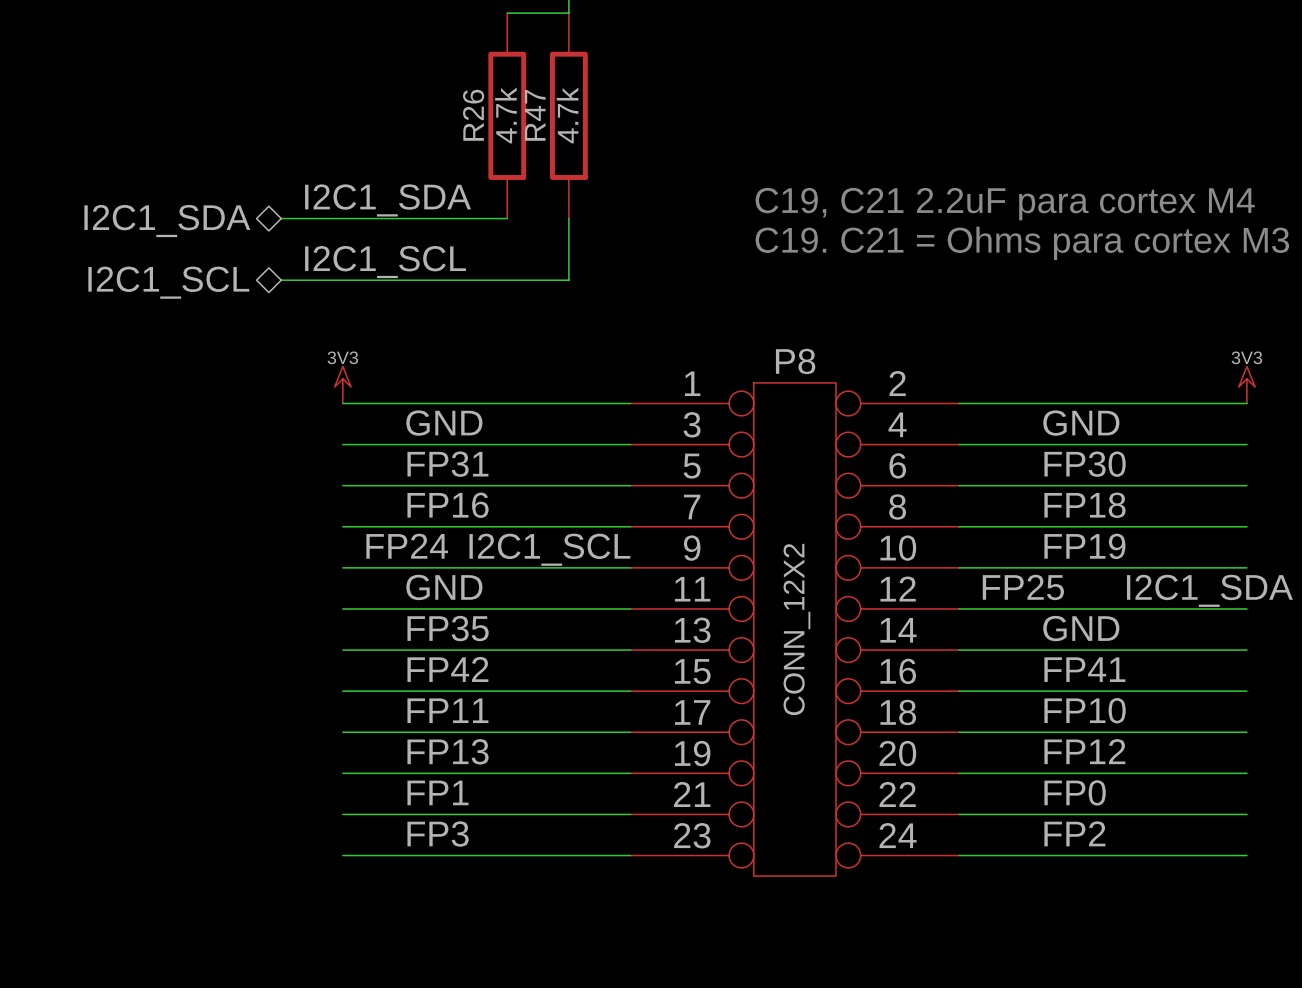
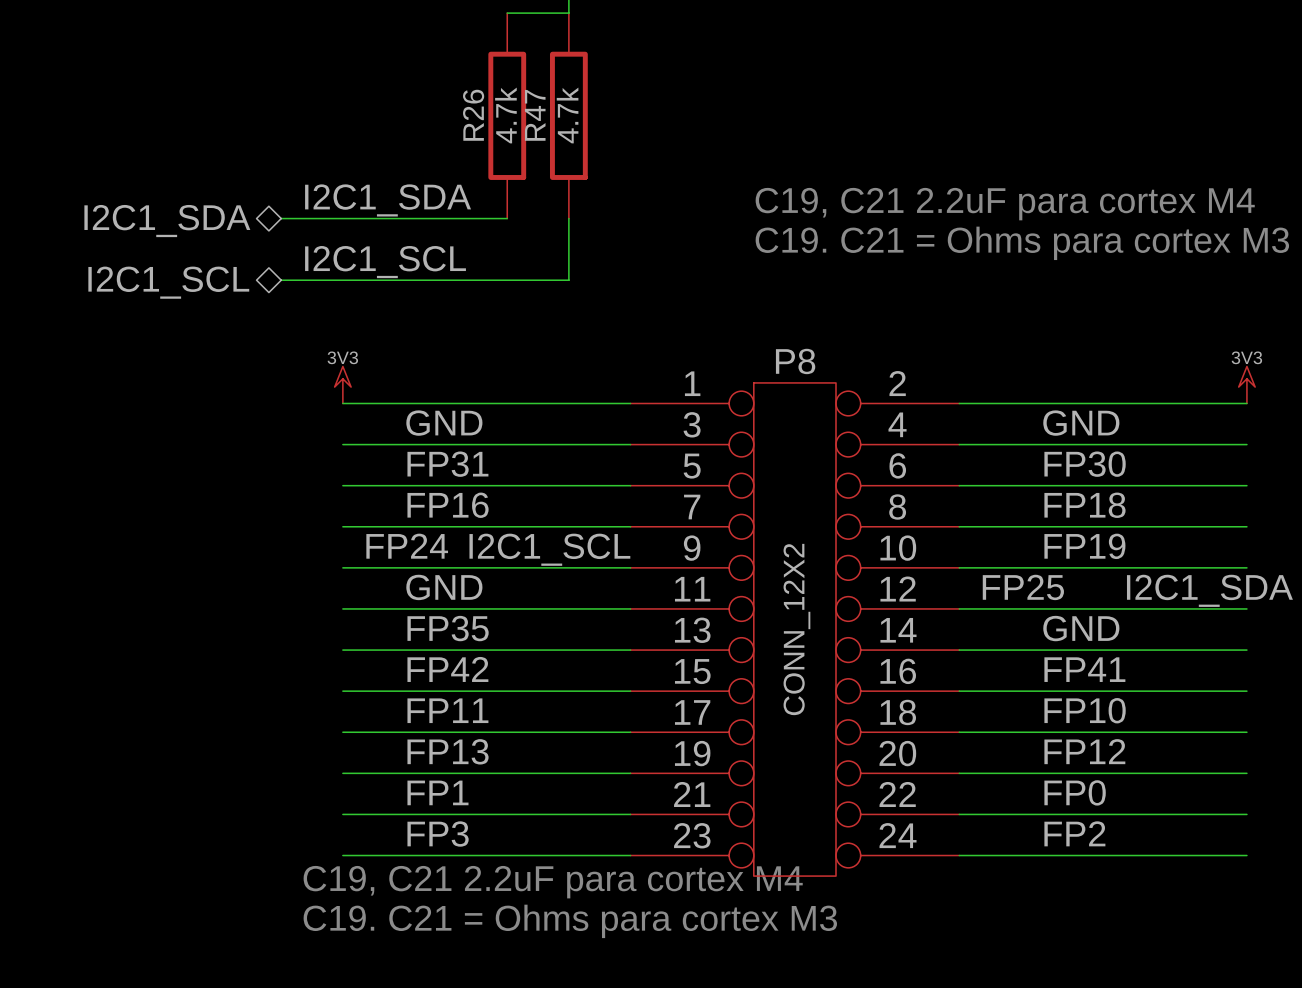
text: none -> C19, C21 2.2uF para cortex M4 (553, 882)
text: none -> C19. C21 = Ohms para cortex M3 (570, 921)

